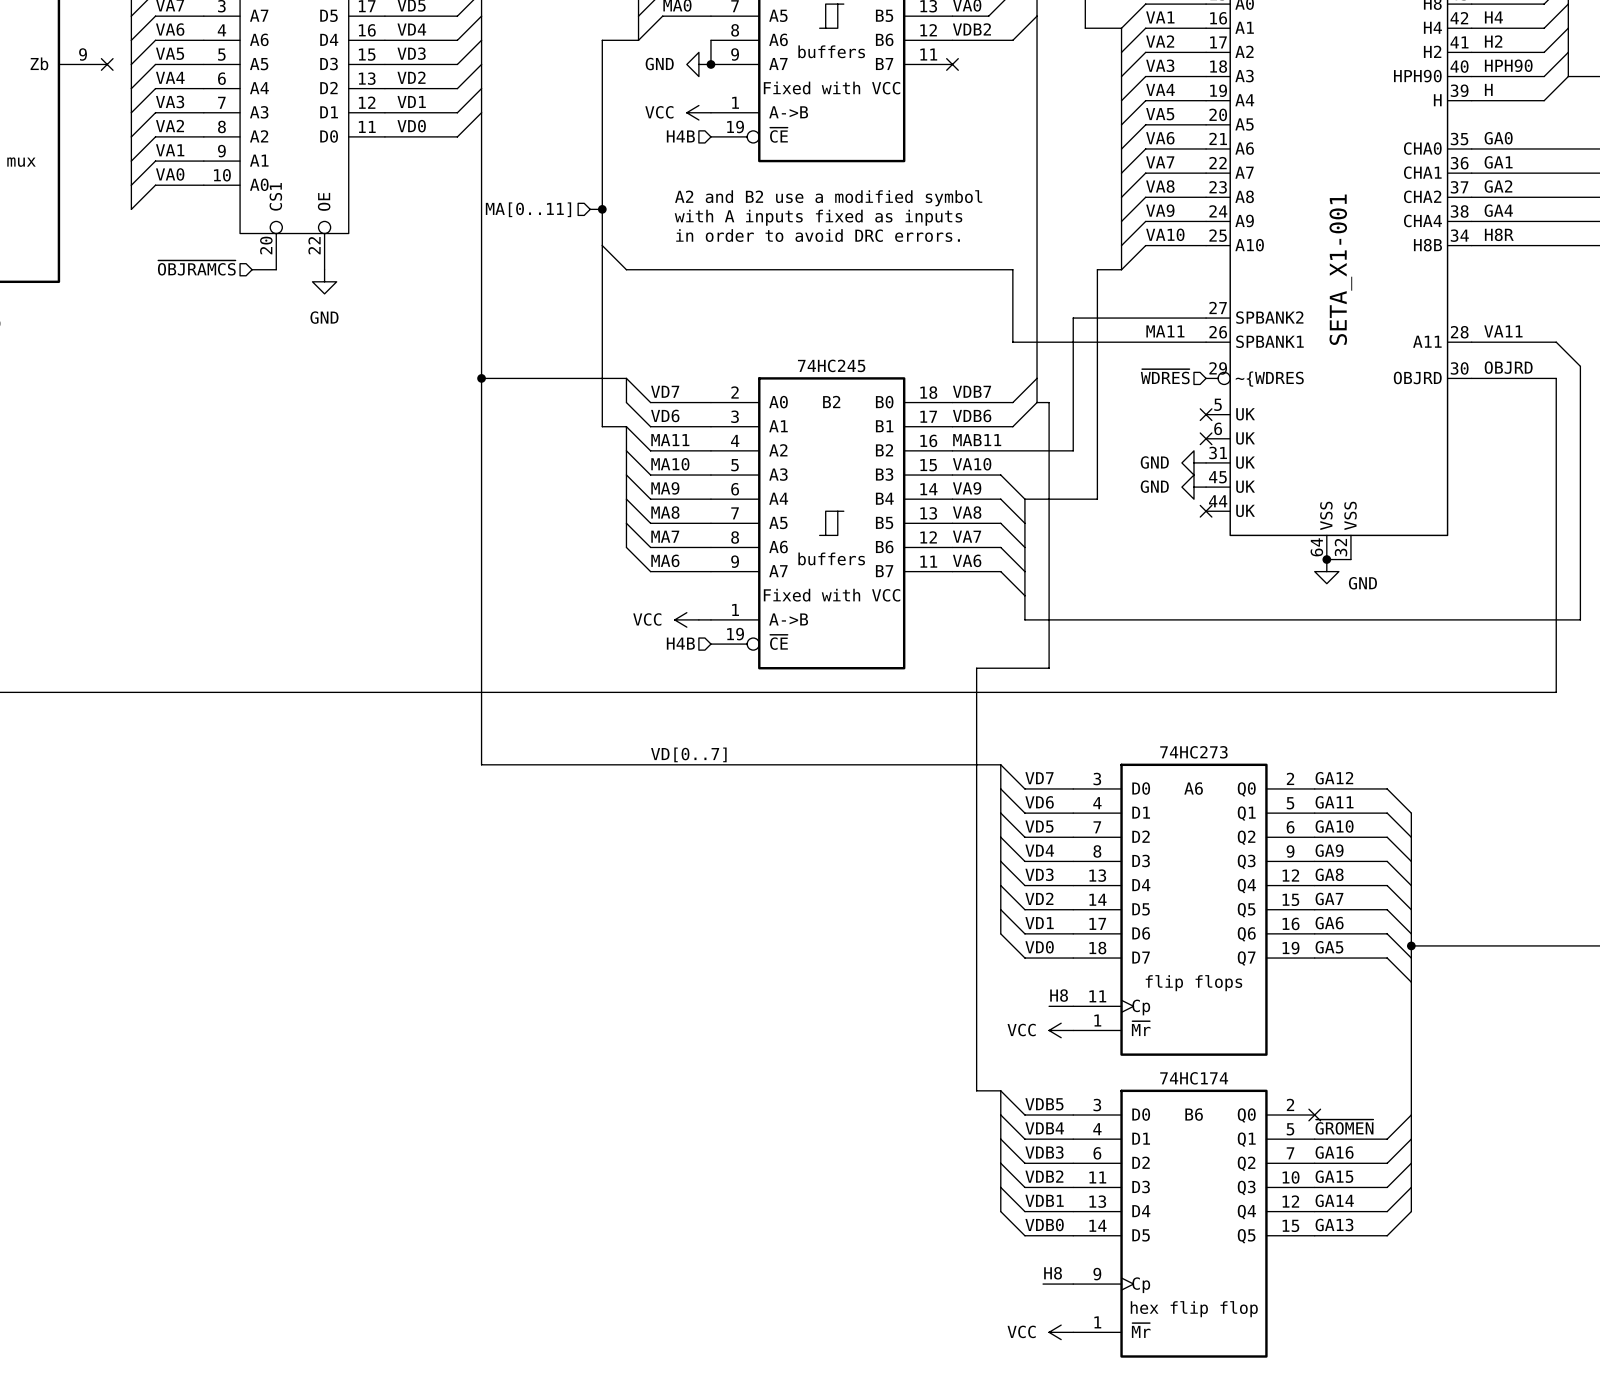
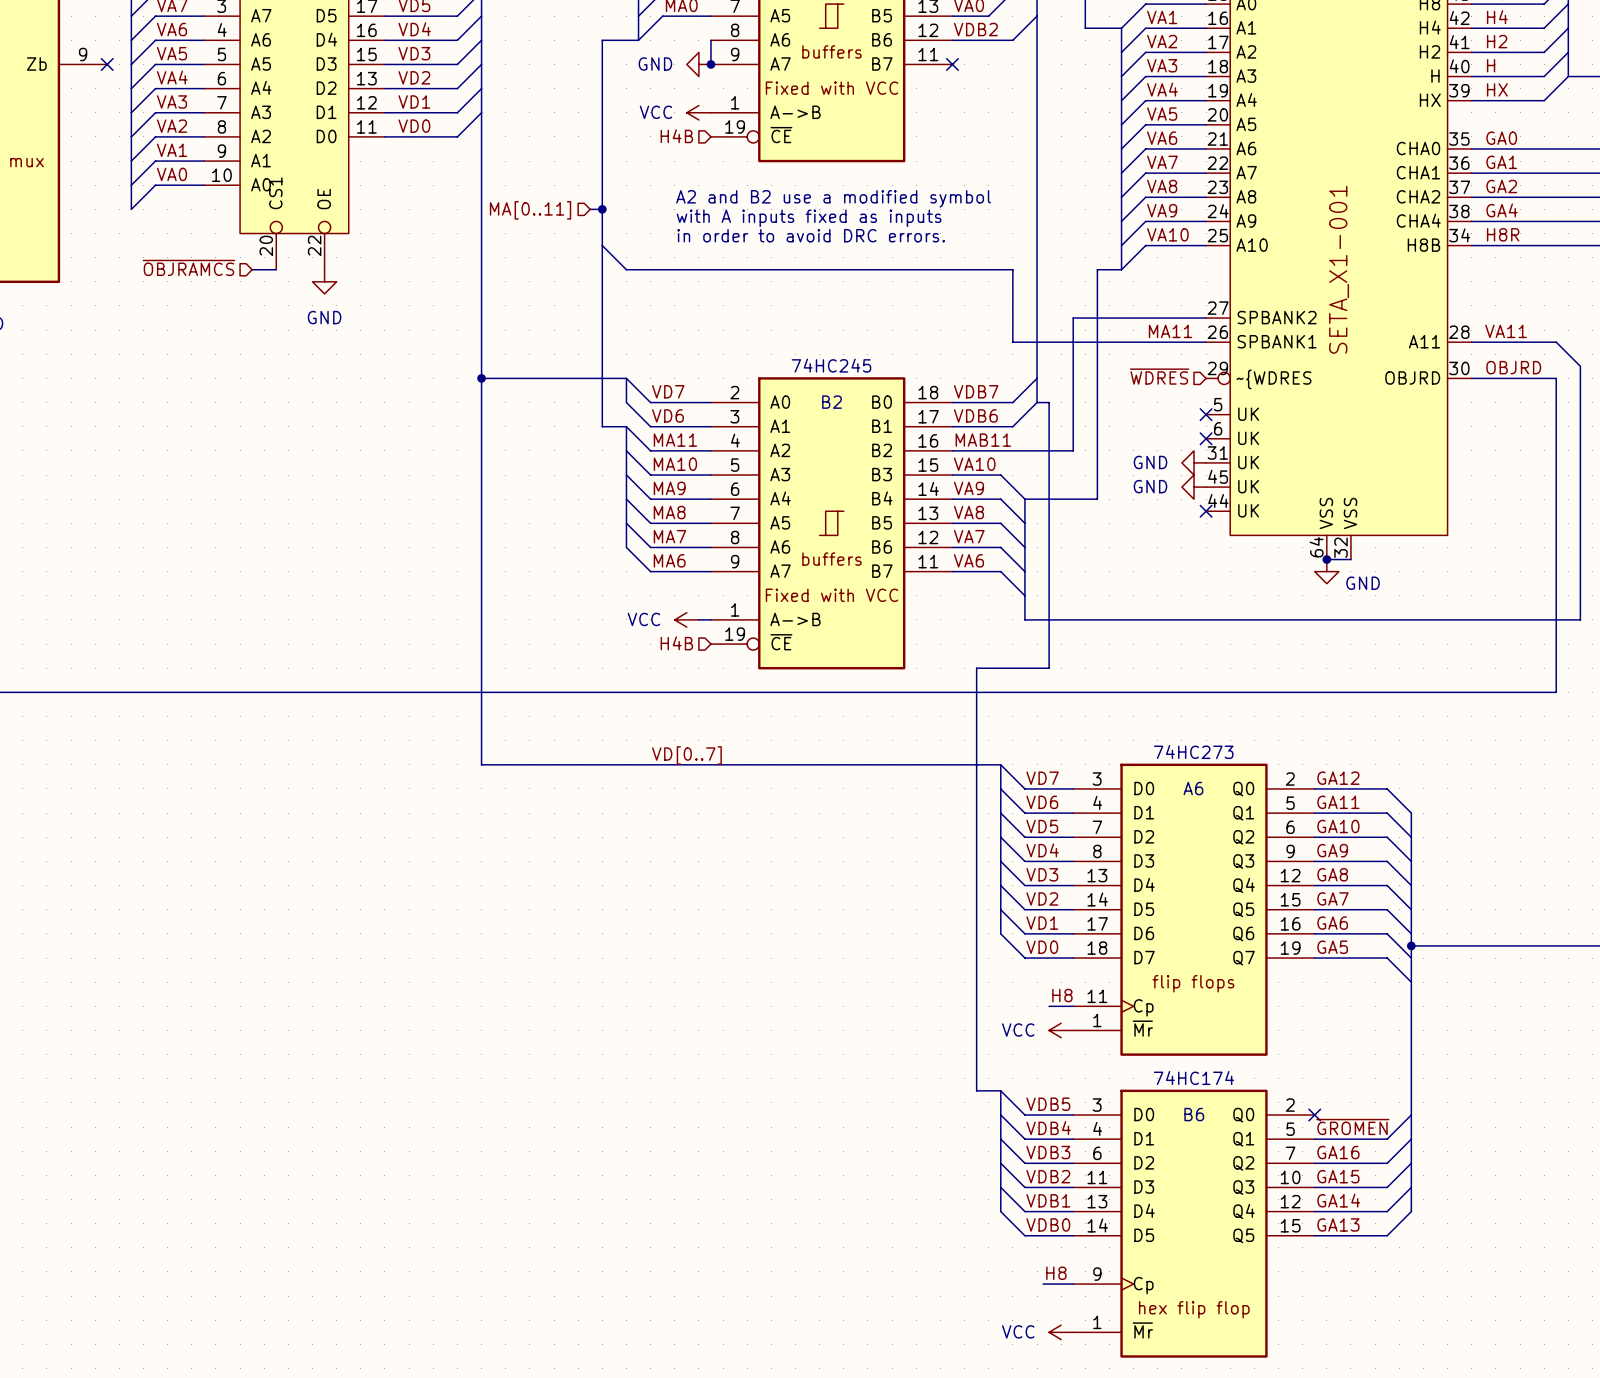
label: HPH90 (1508, 65) -> H (1491, 65)
part pin name: HPH90 (1417, 76) -> H (1435, 76)
label: H (1488, 89) -> HX (1497, 89)
part pin name: H (1437, 100) -> HX (1430, 100)

